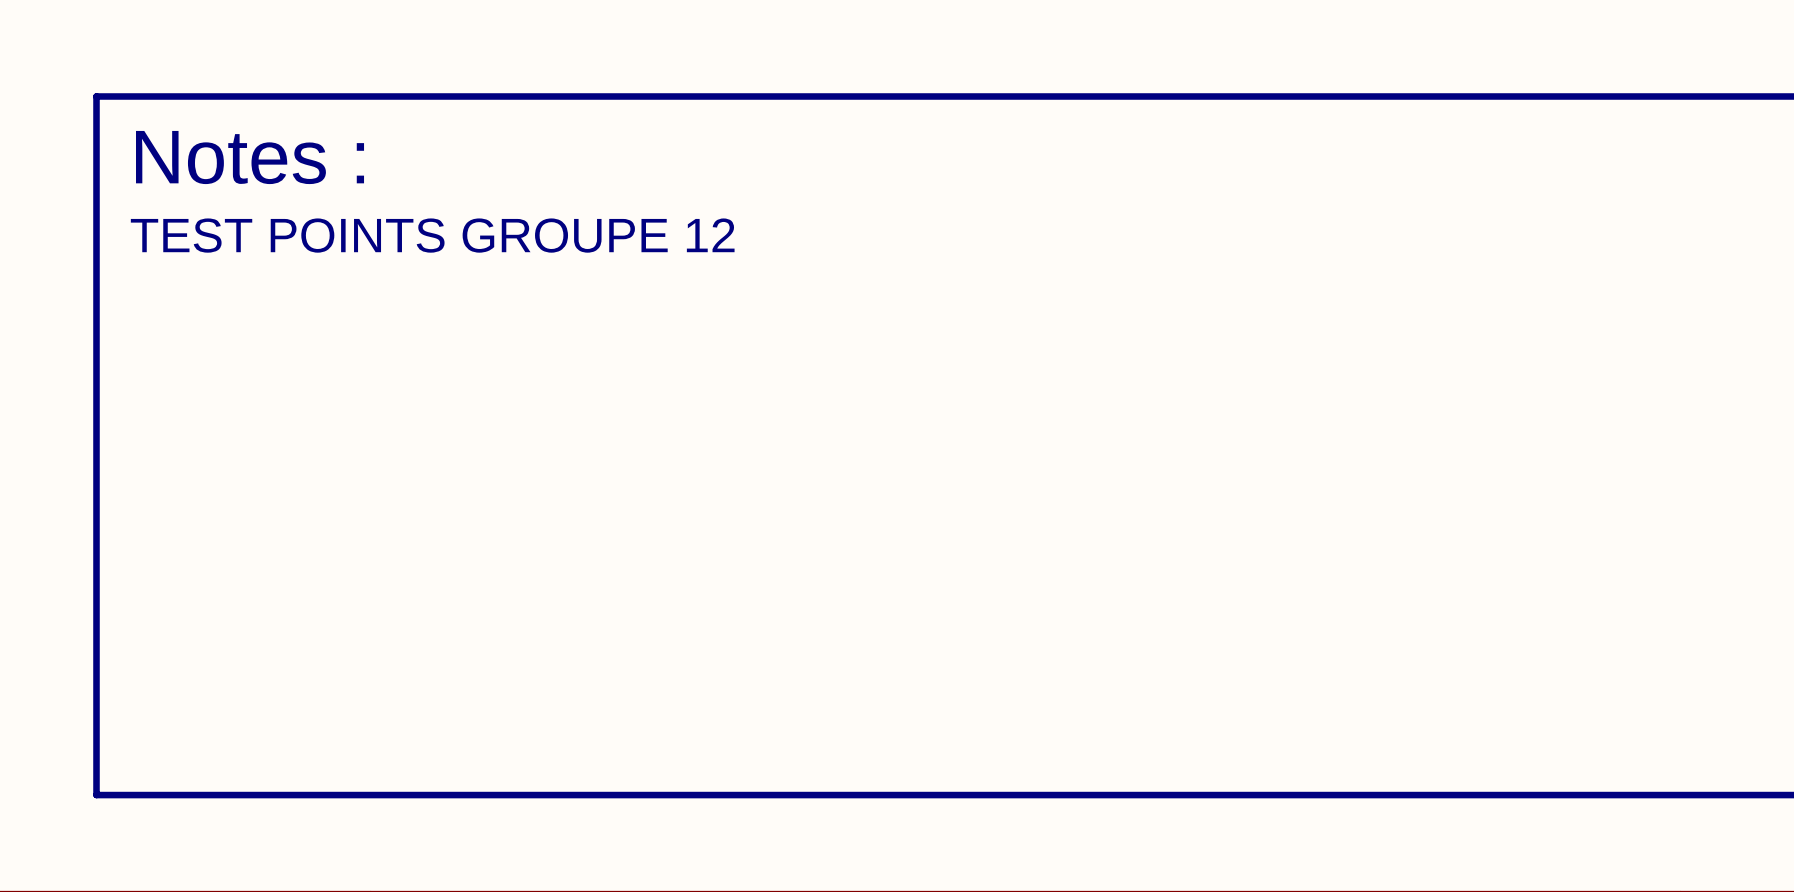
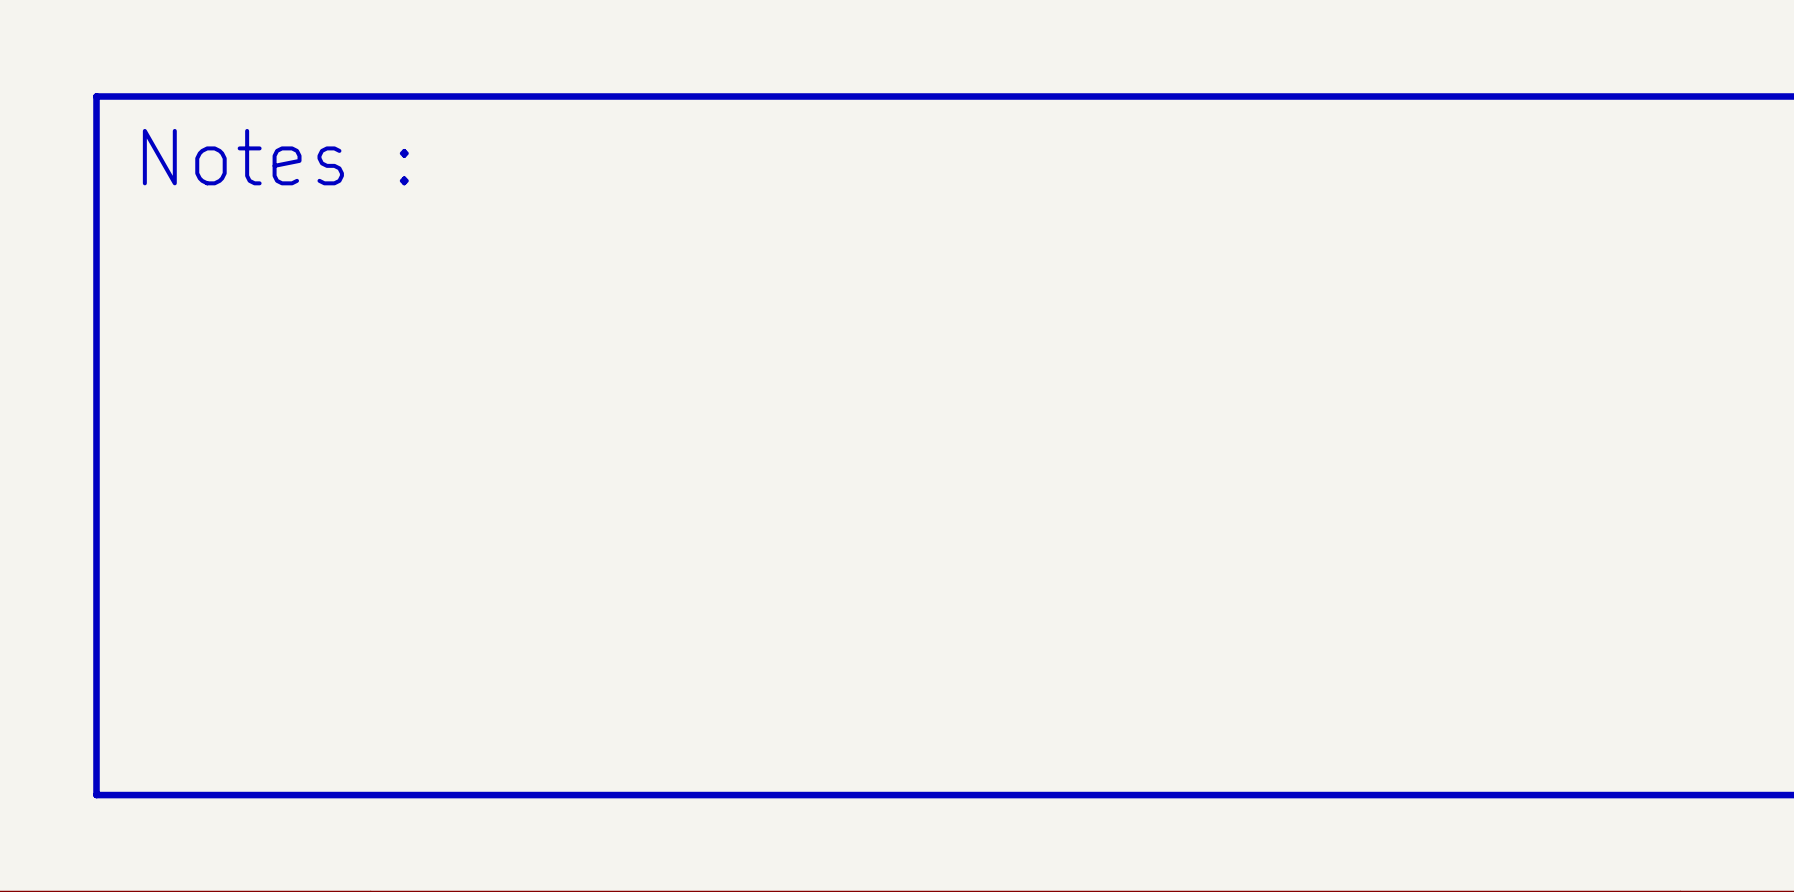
text: TEST POINTS GROUPE 12 (432, 235) -> none

